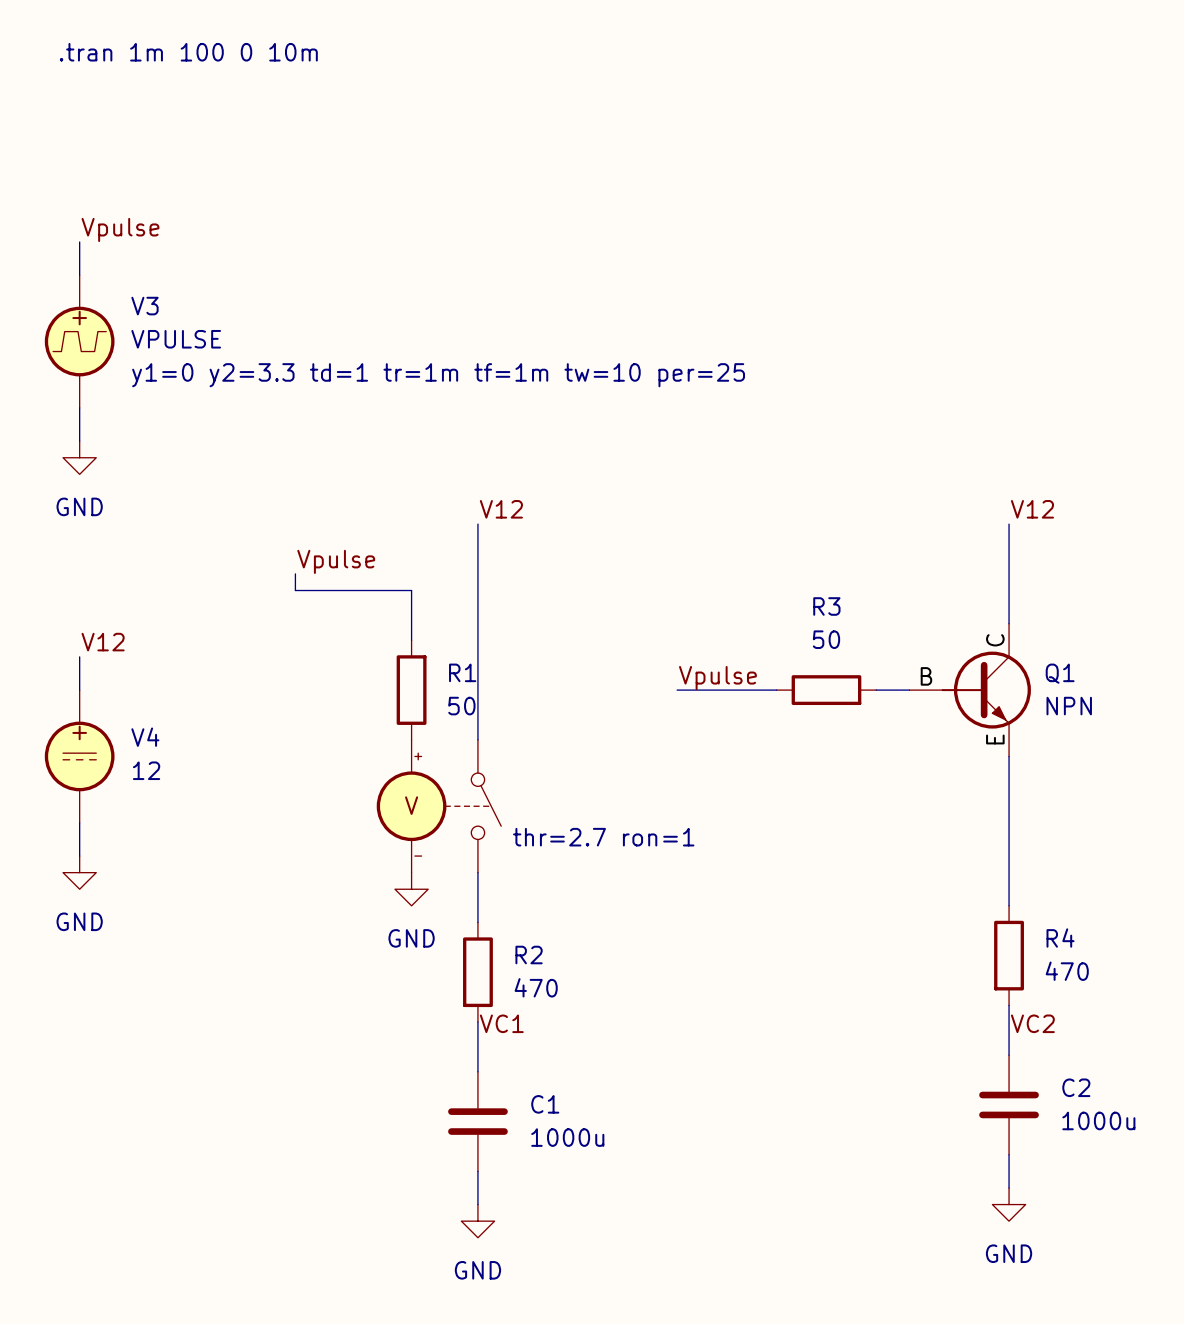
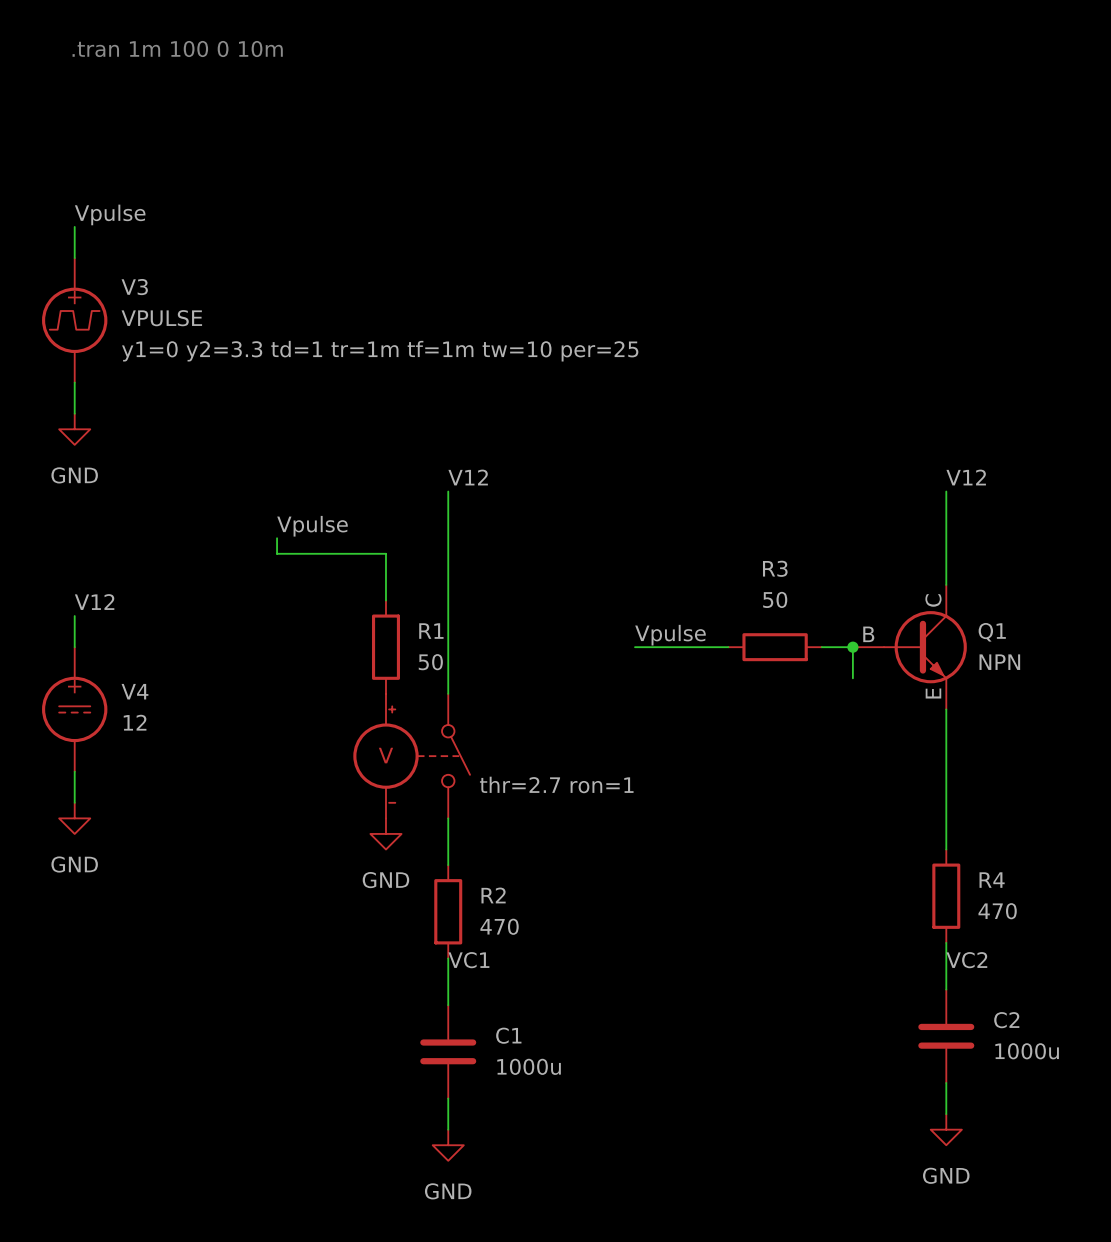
wire: none -> (852, 647) (852, 678)
junction: none -> (852, 647)

